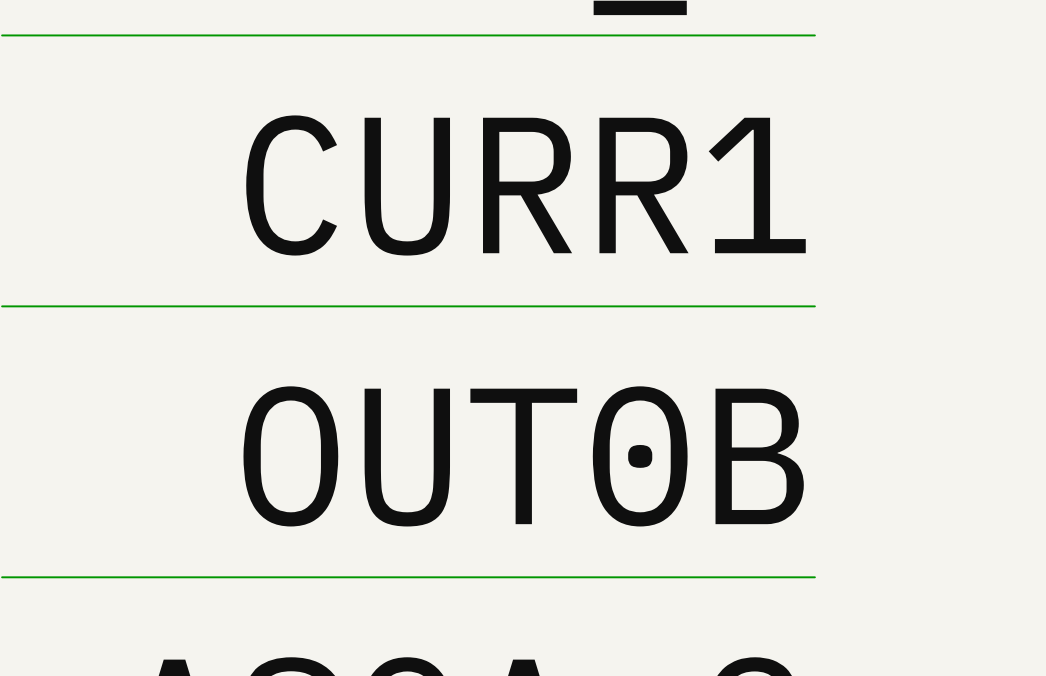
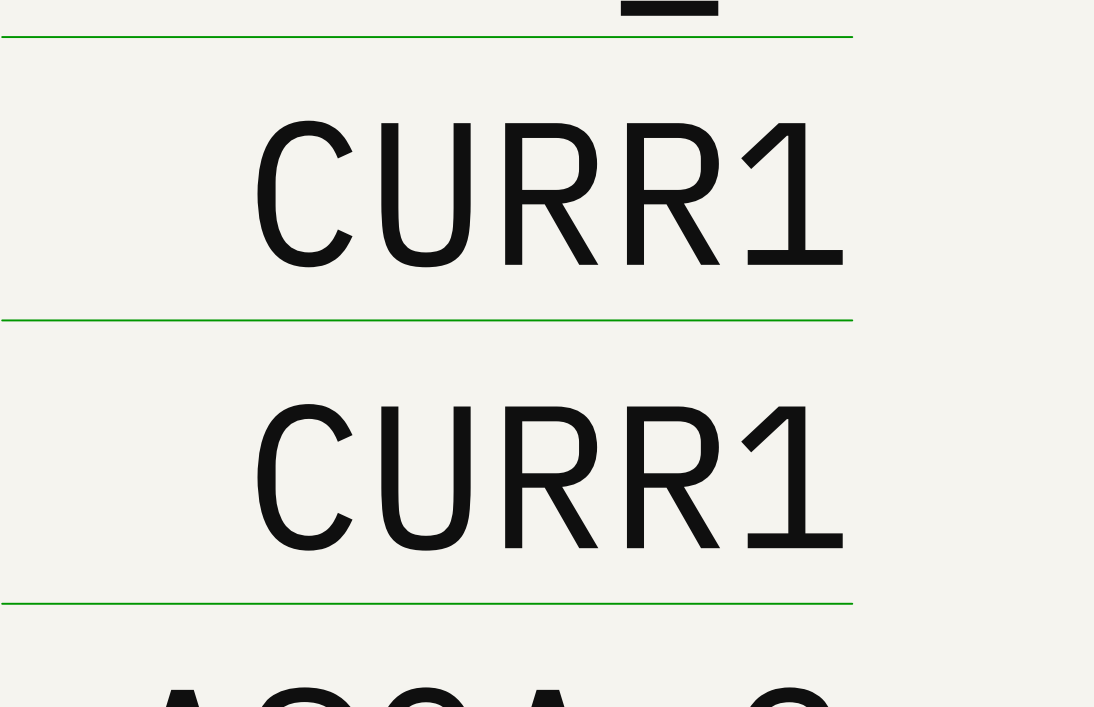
label: OUT0B (523, 456) -> CURR1 (550, 477)

